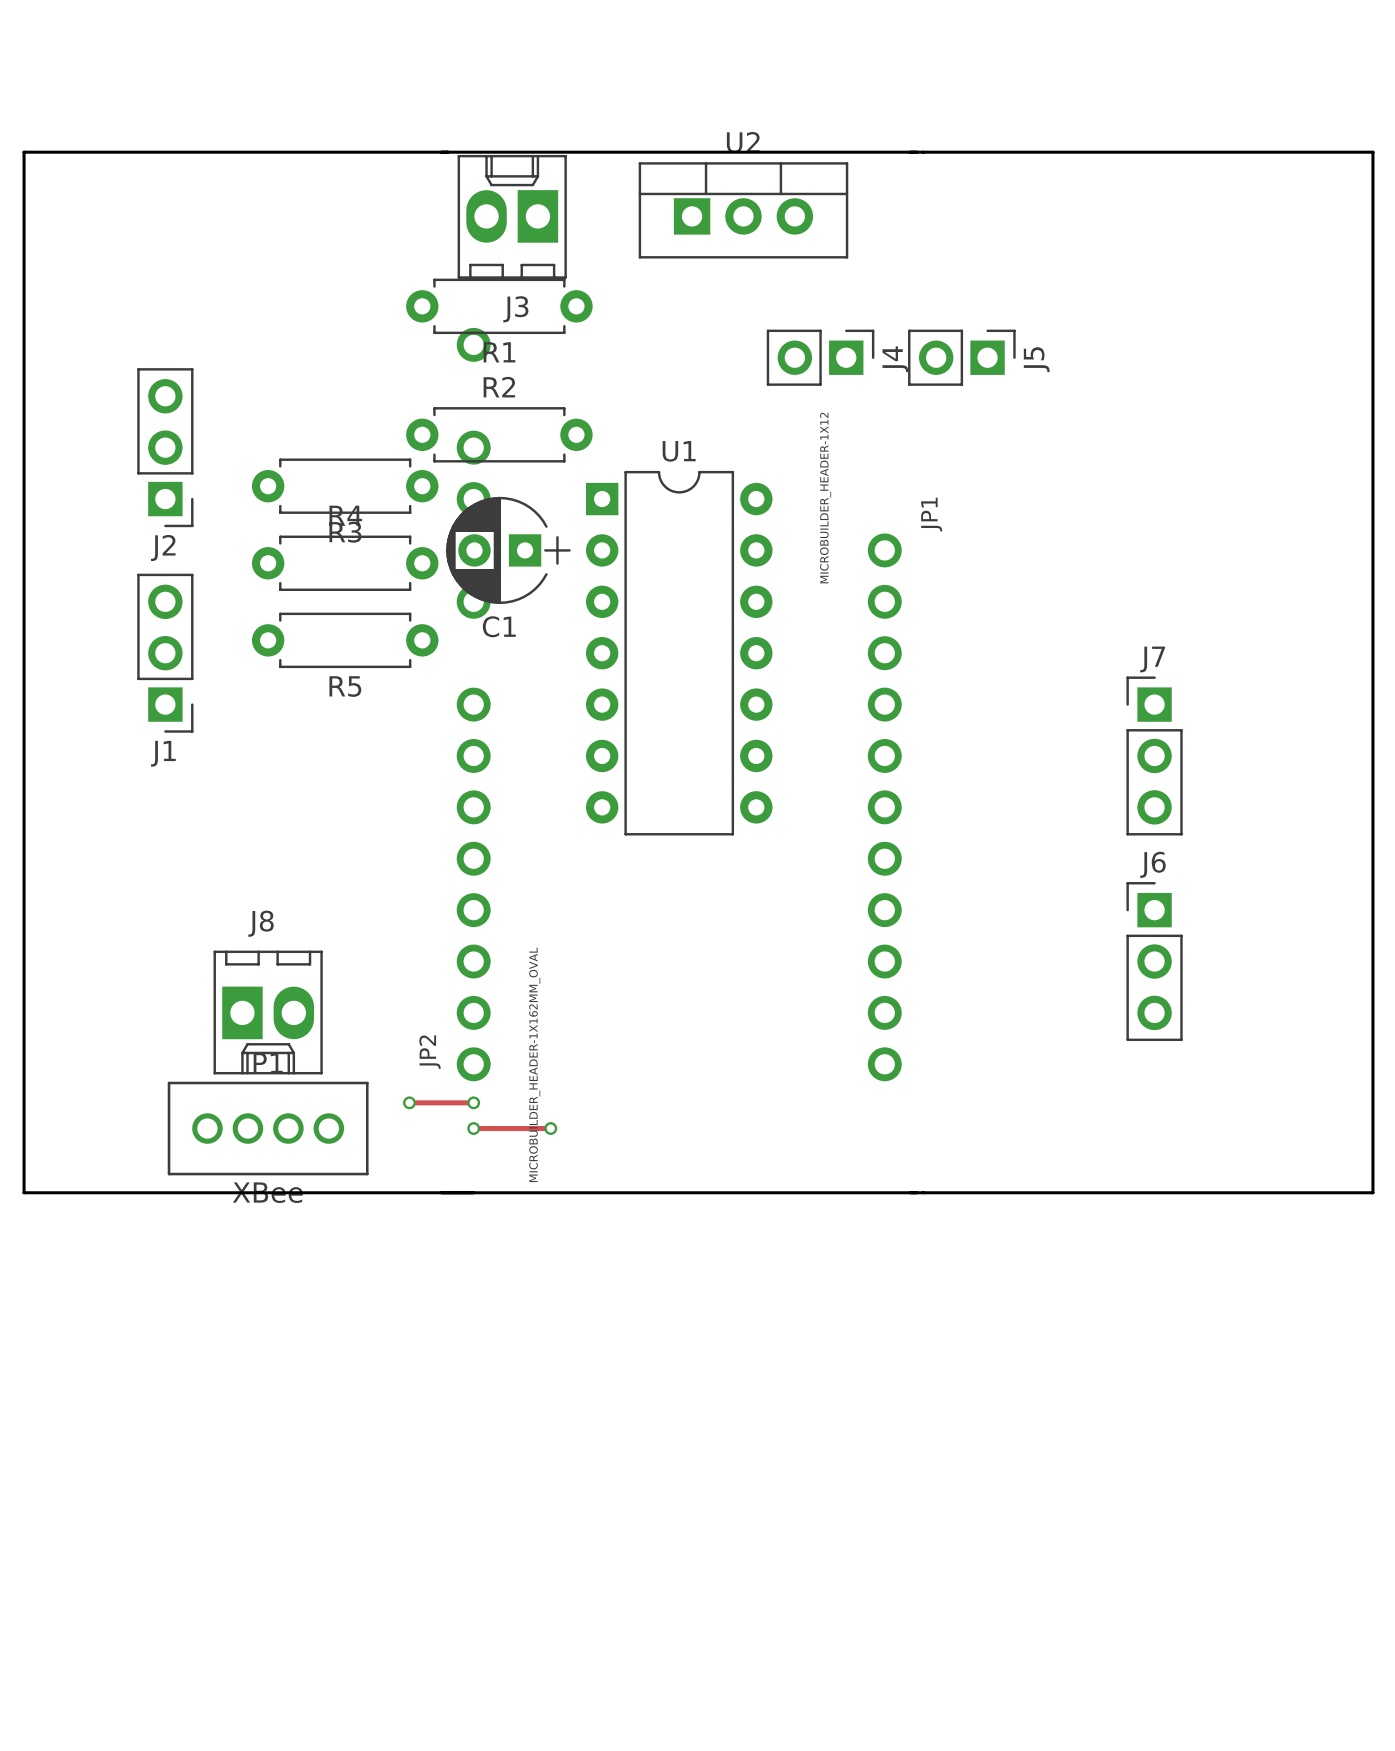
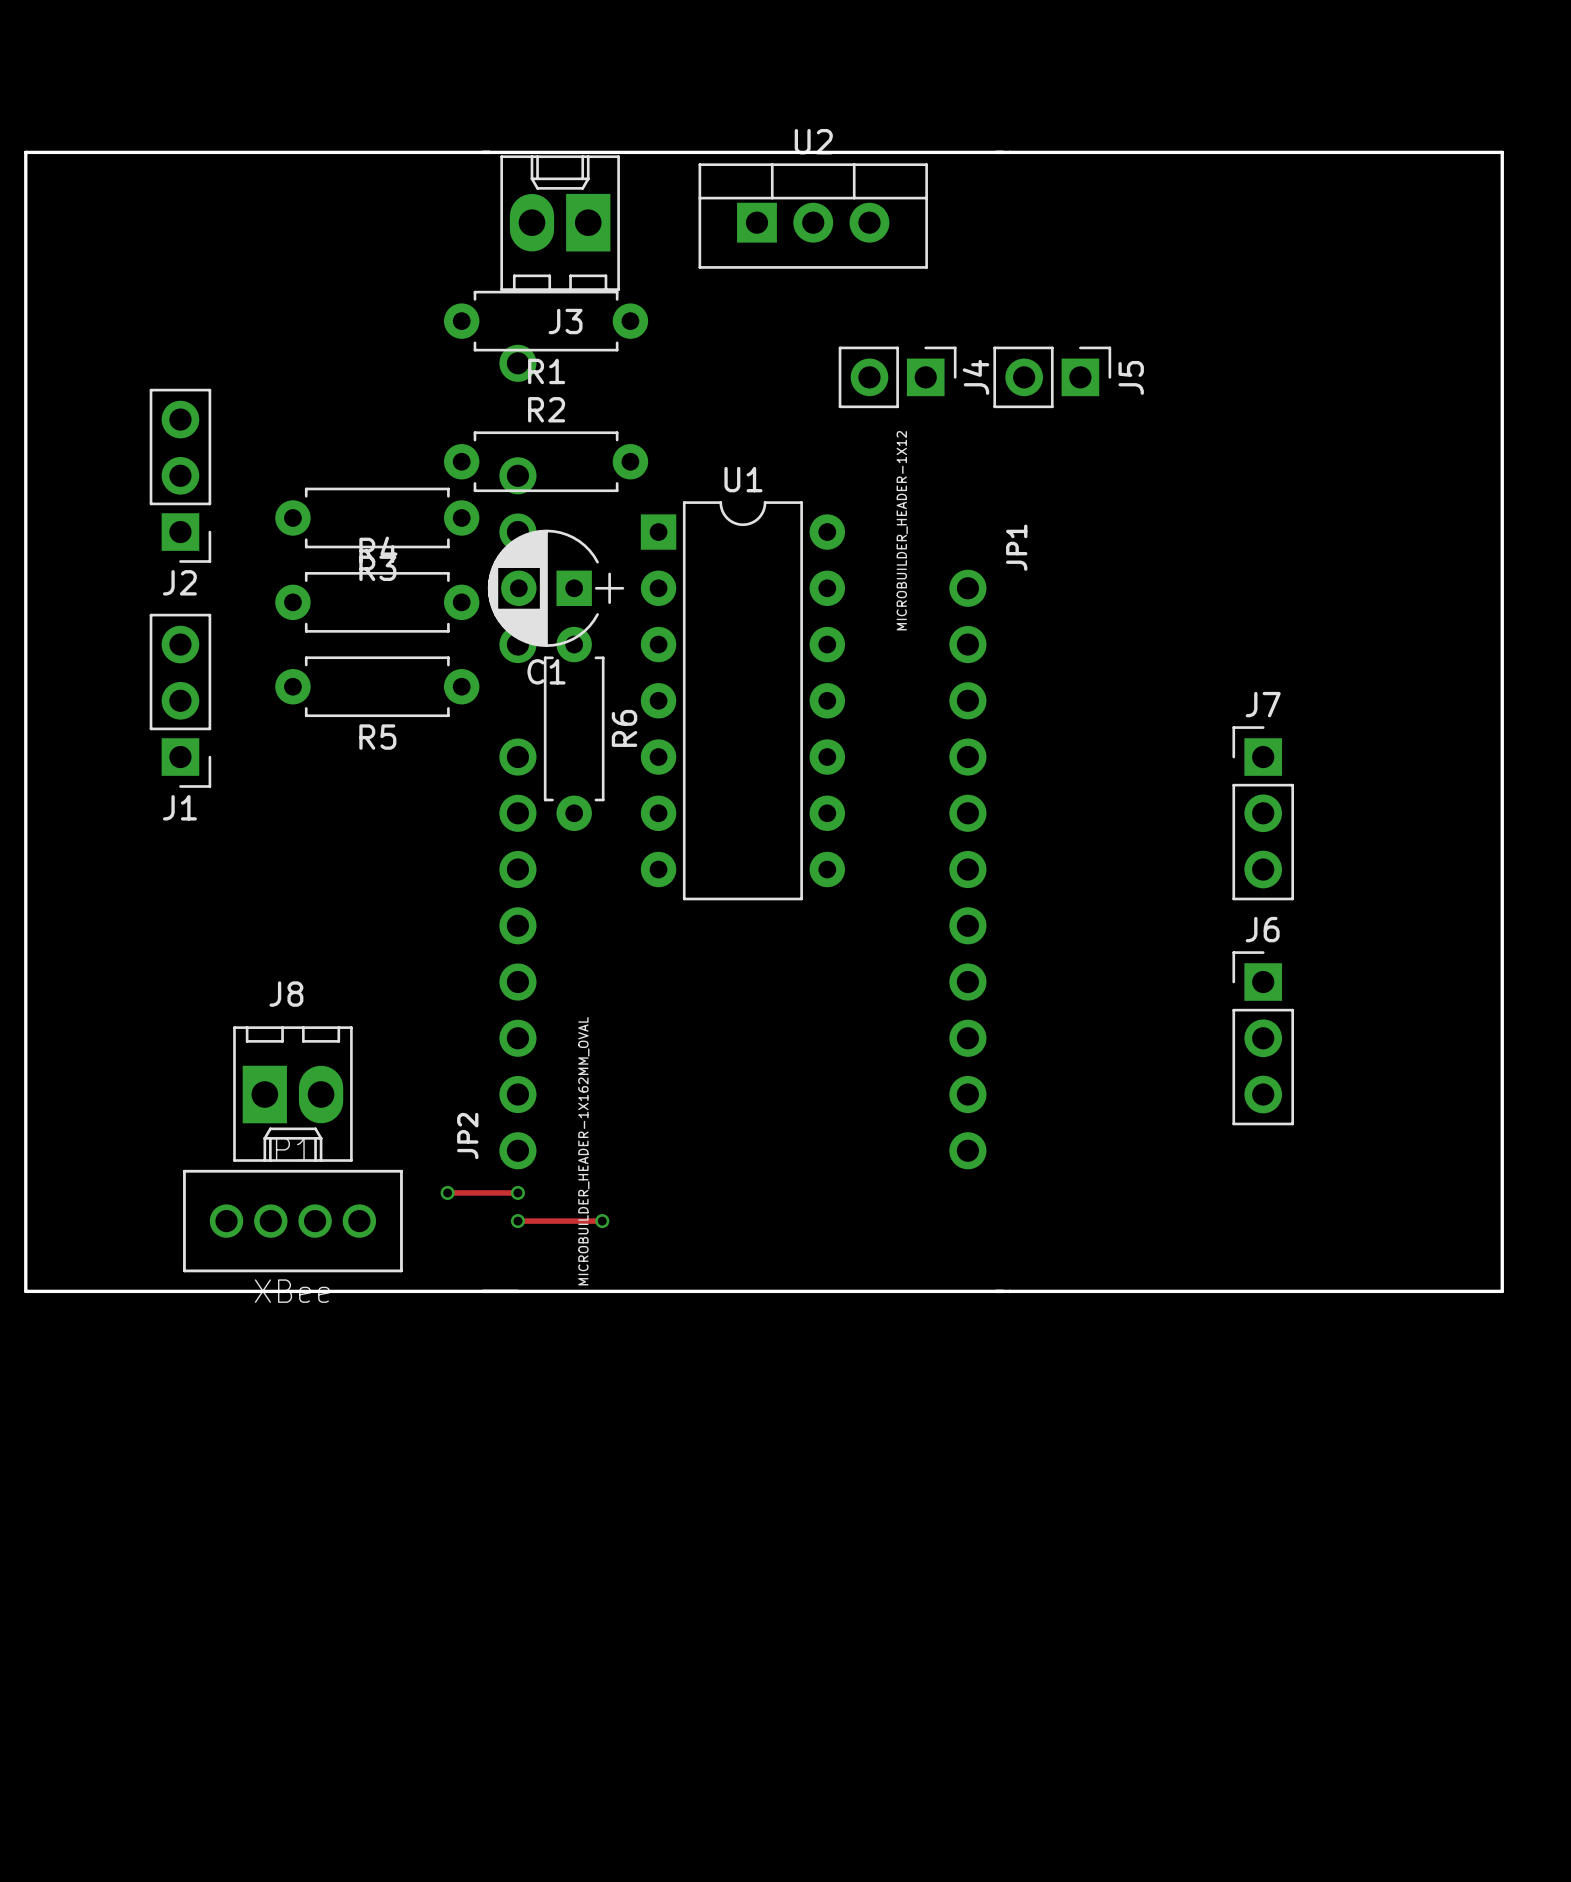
R6: none -> (574, 728)

